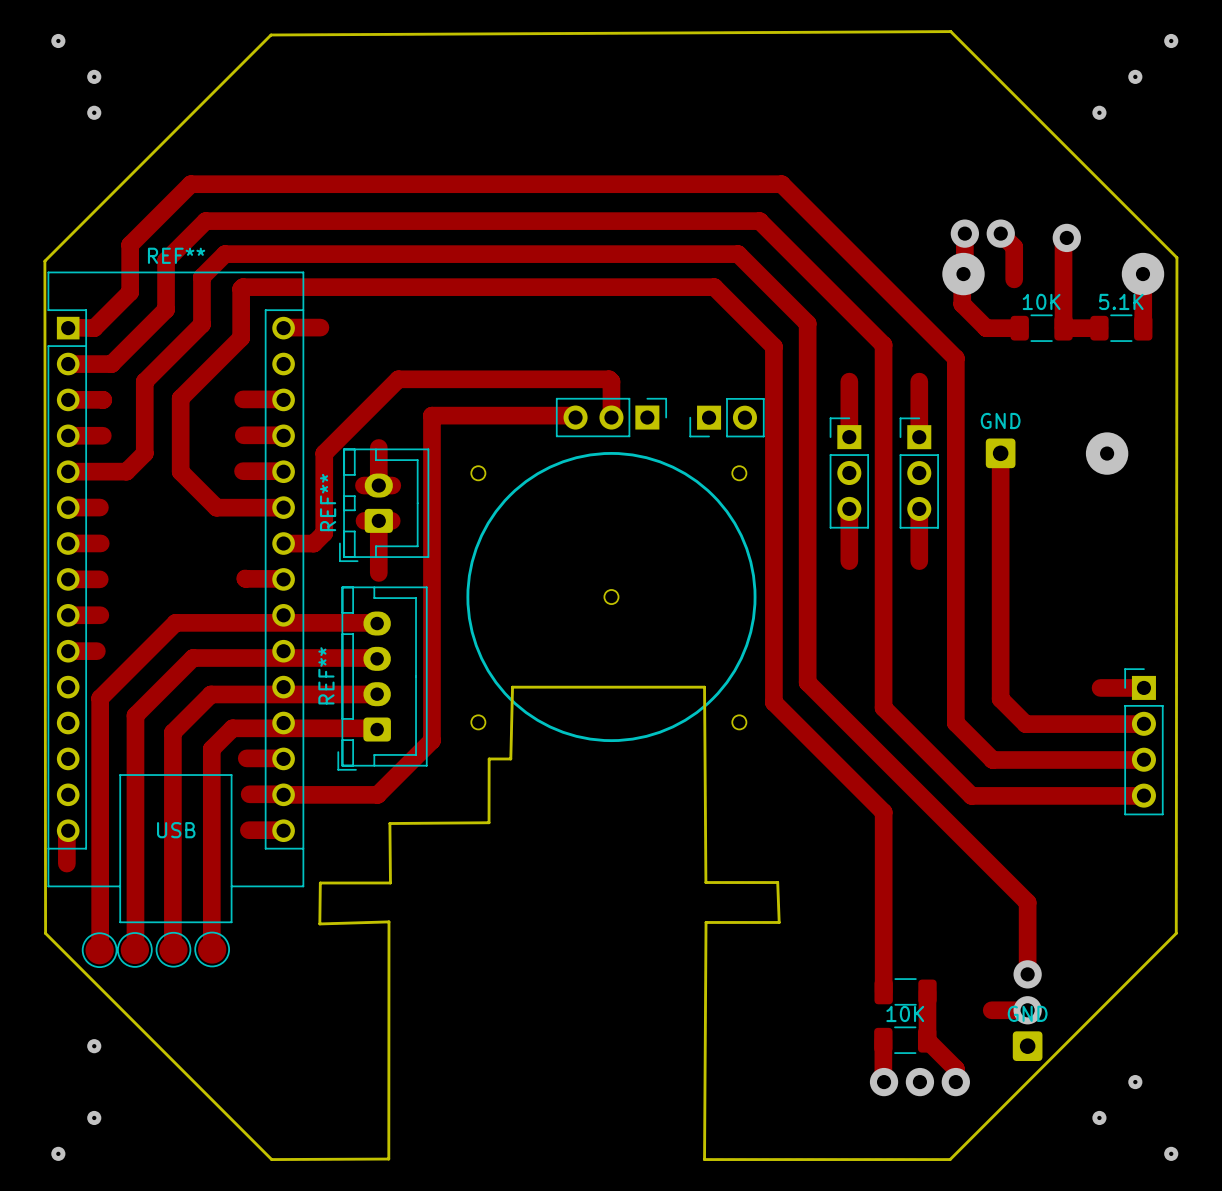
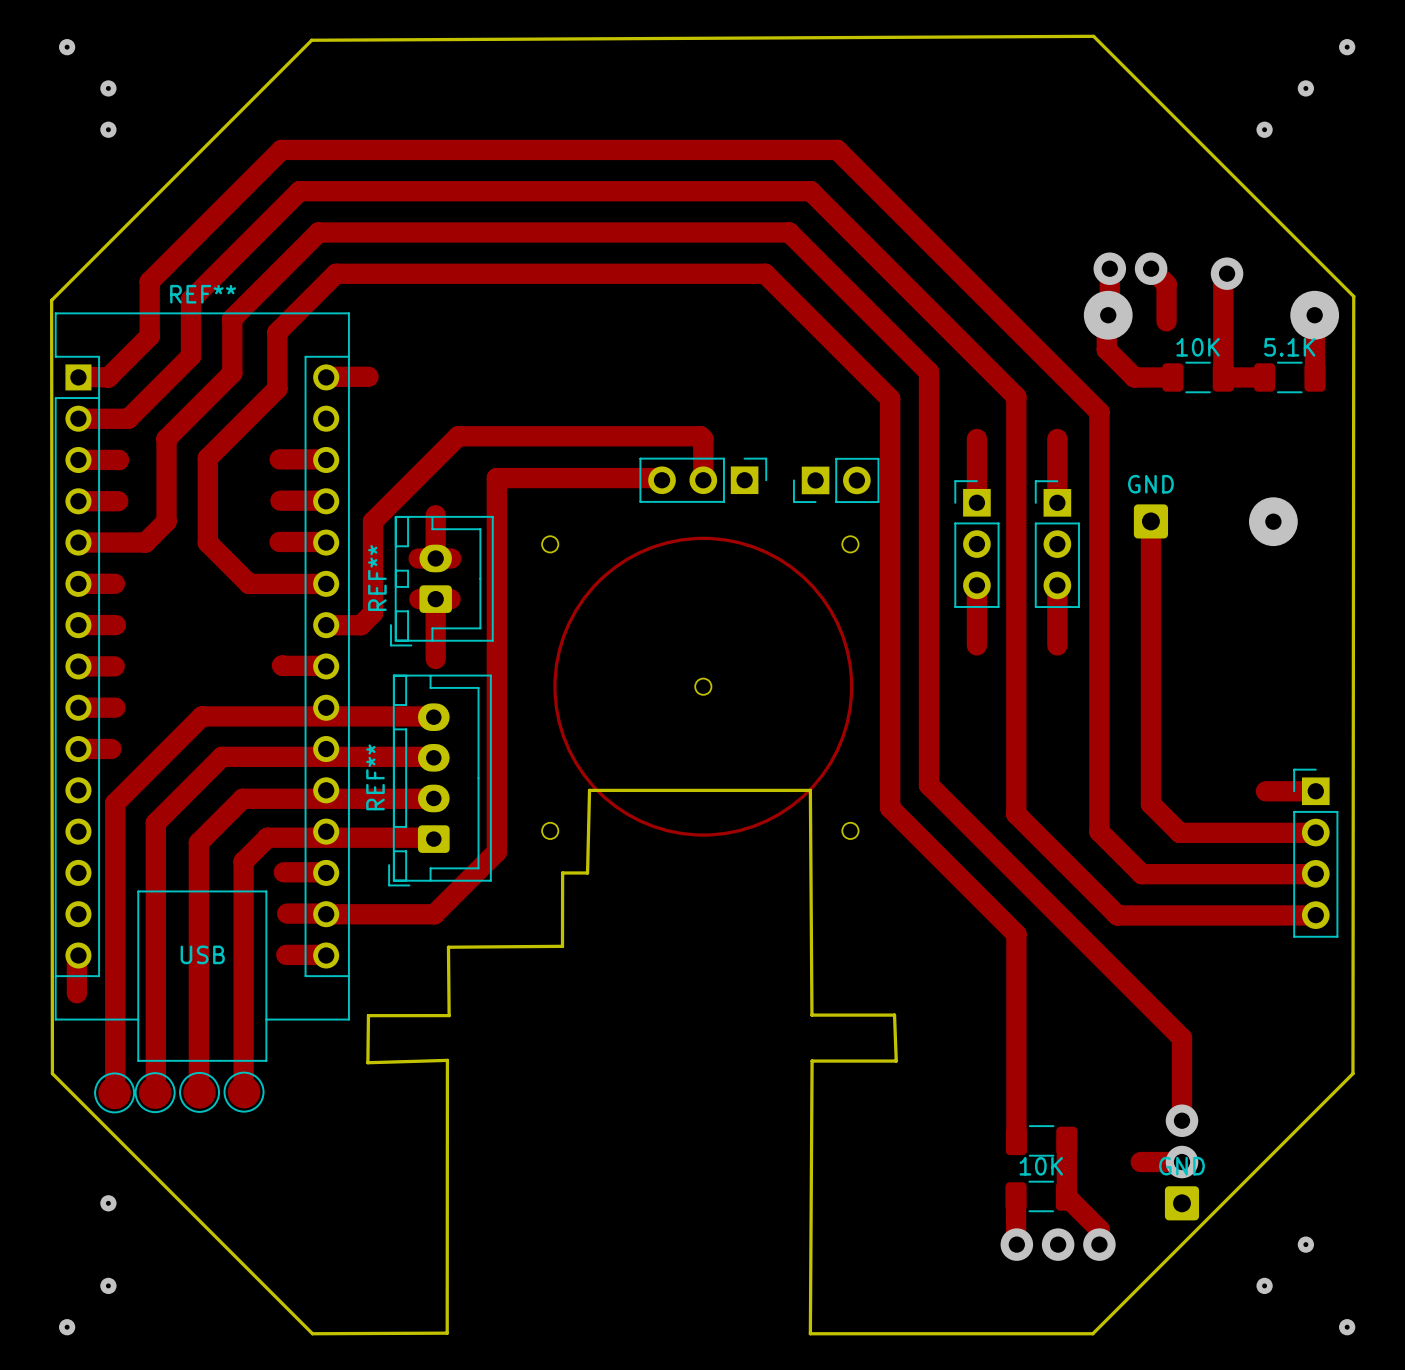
track: (190, 184) (781, 184) -> (219, 211) (281, 149) (837, 149) (899, 211)
track: (205, 221) (759, 221) -> (236, 254) (299, 191) (810, 191) (873, 254)
track: (224, 254) (738, 254) -> (258, 292) (318, 232) (789, 232) (849, 292)
track: (242, 287) (714, 287) -> (279, 330) (335, 273) (765, 273) (821, 330)
drawing shape: [466, 452, 757, 743] -> [553, 536, 854, 837]

